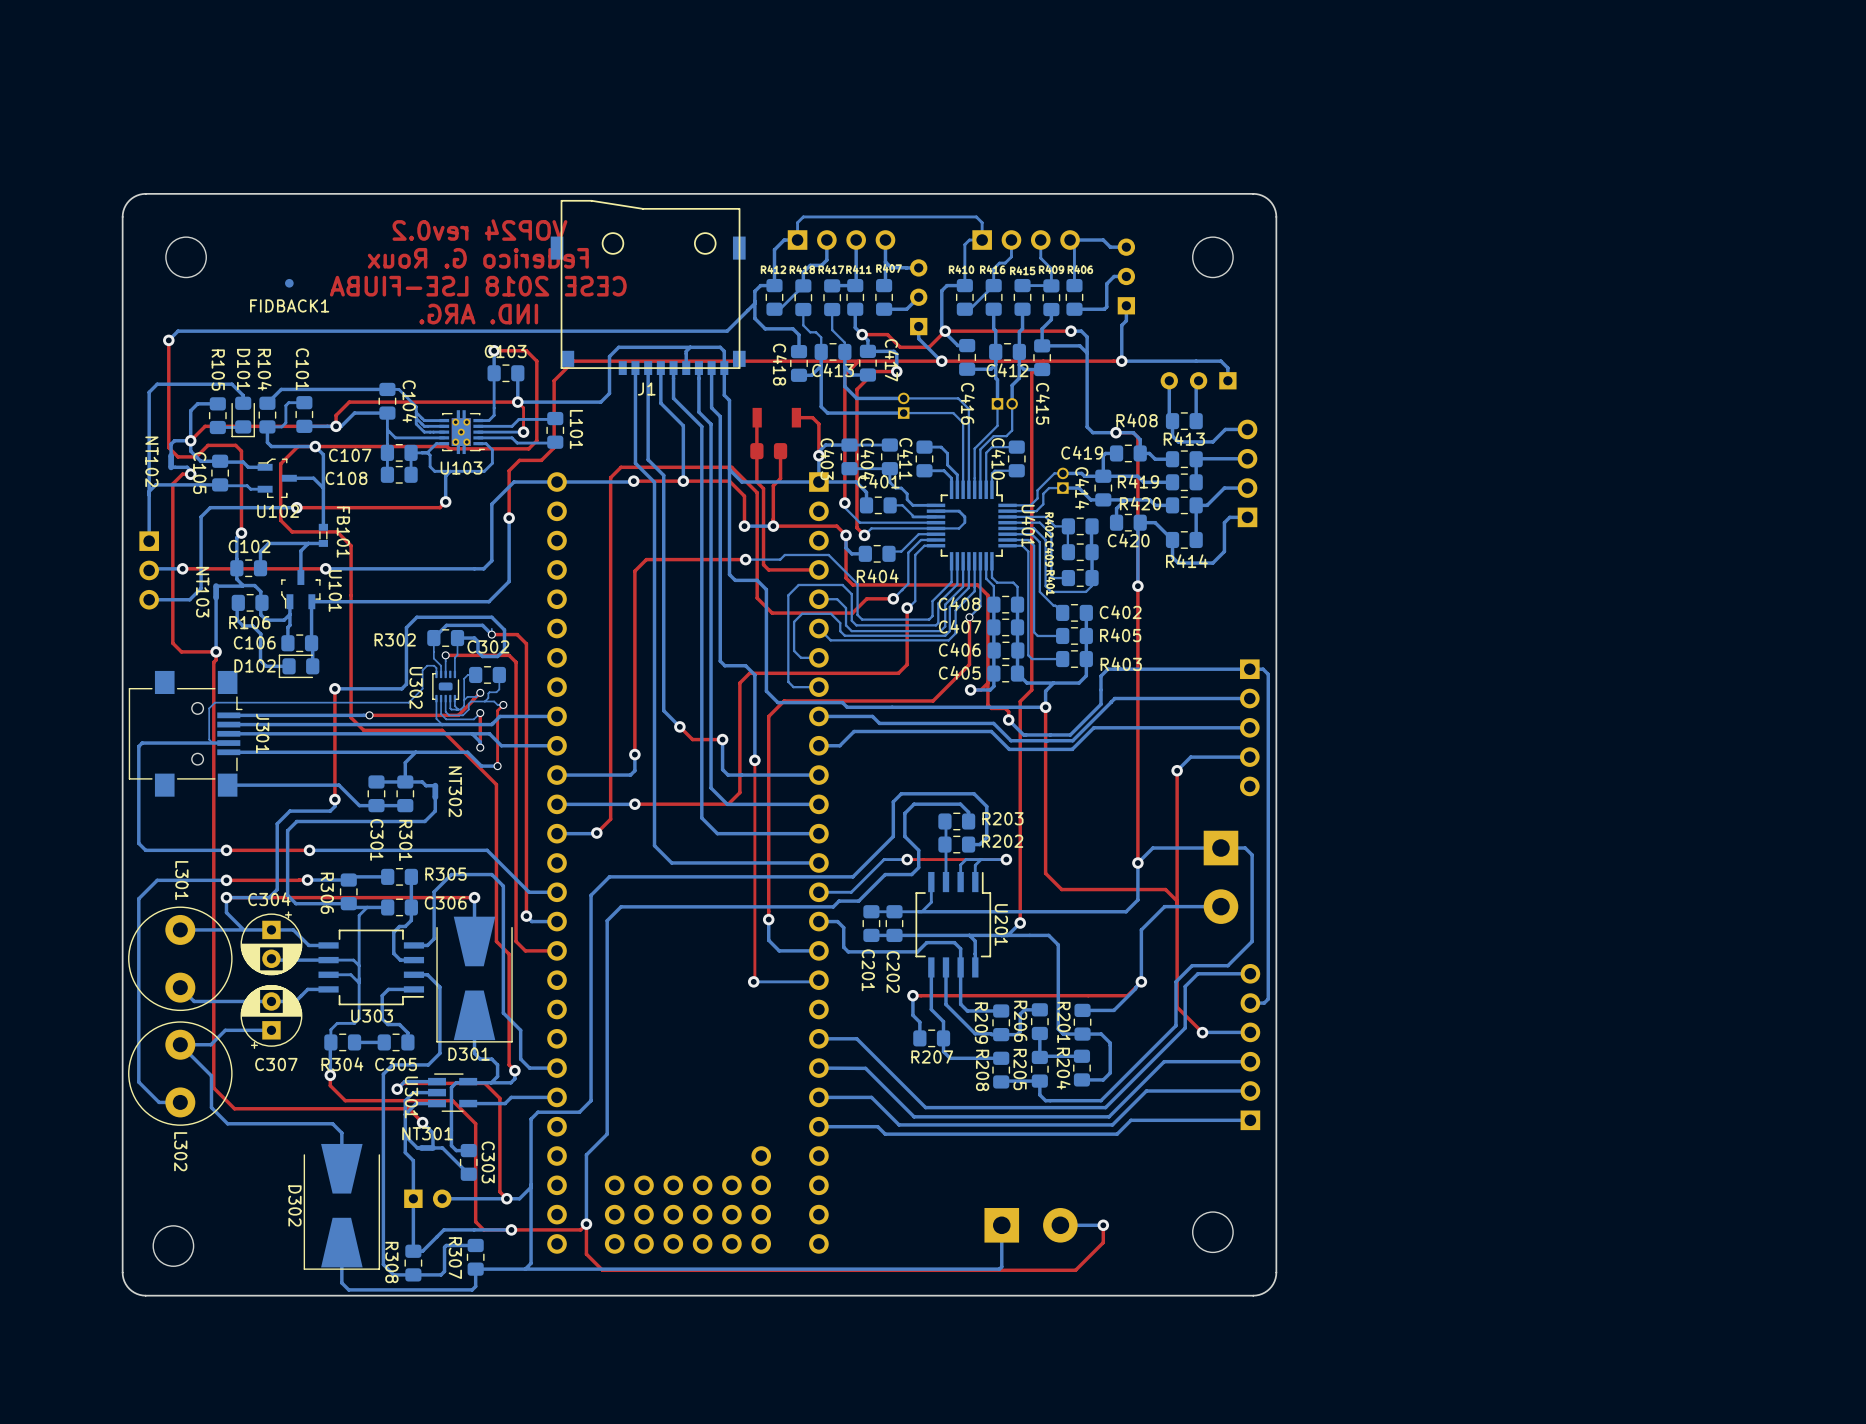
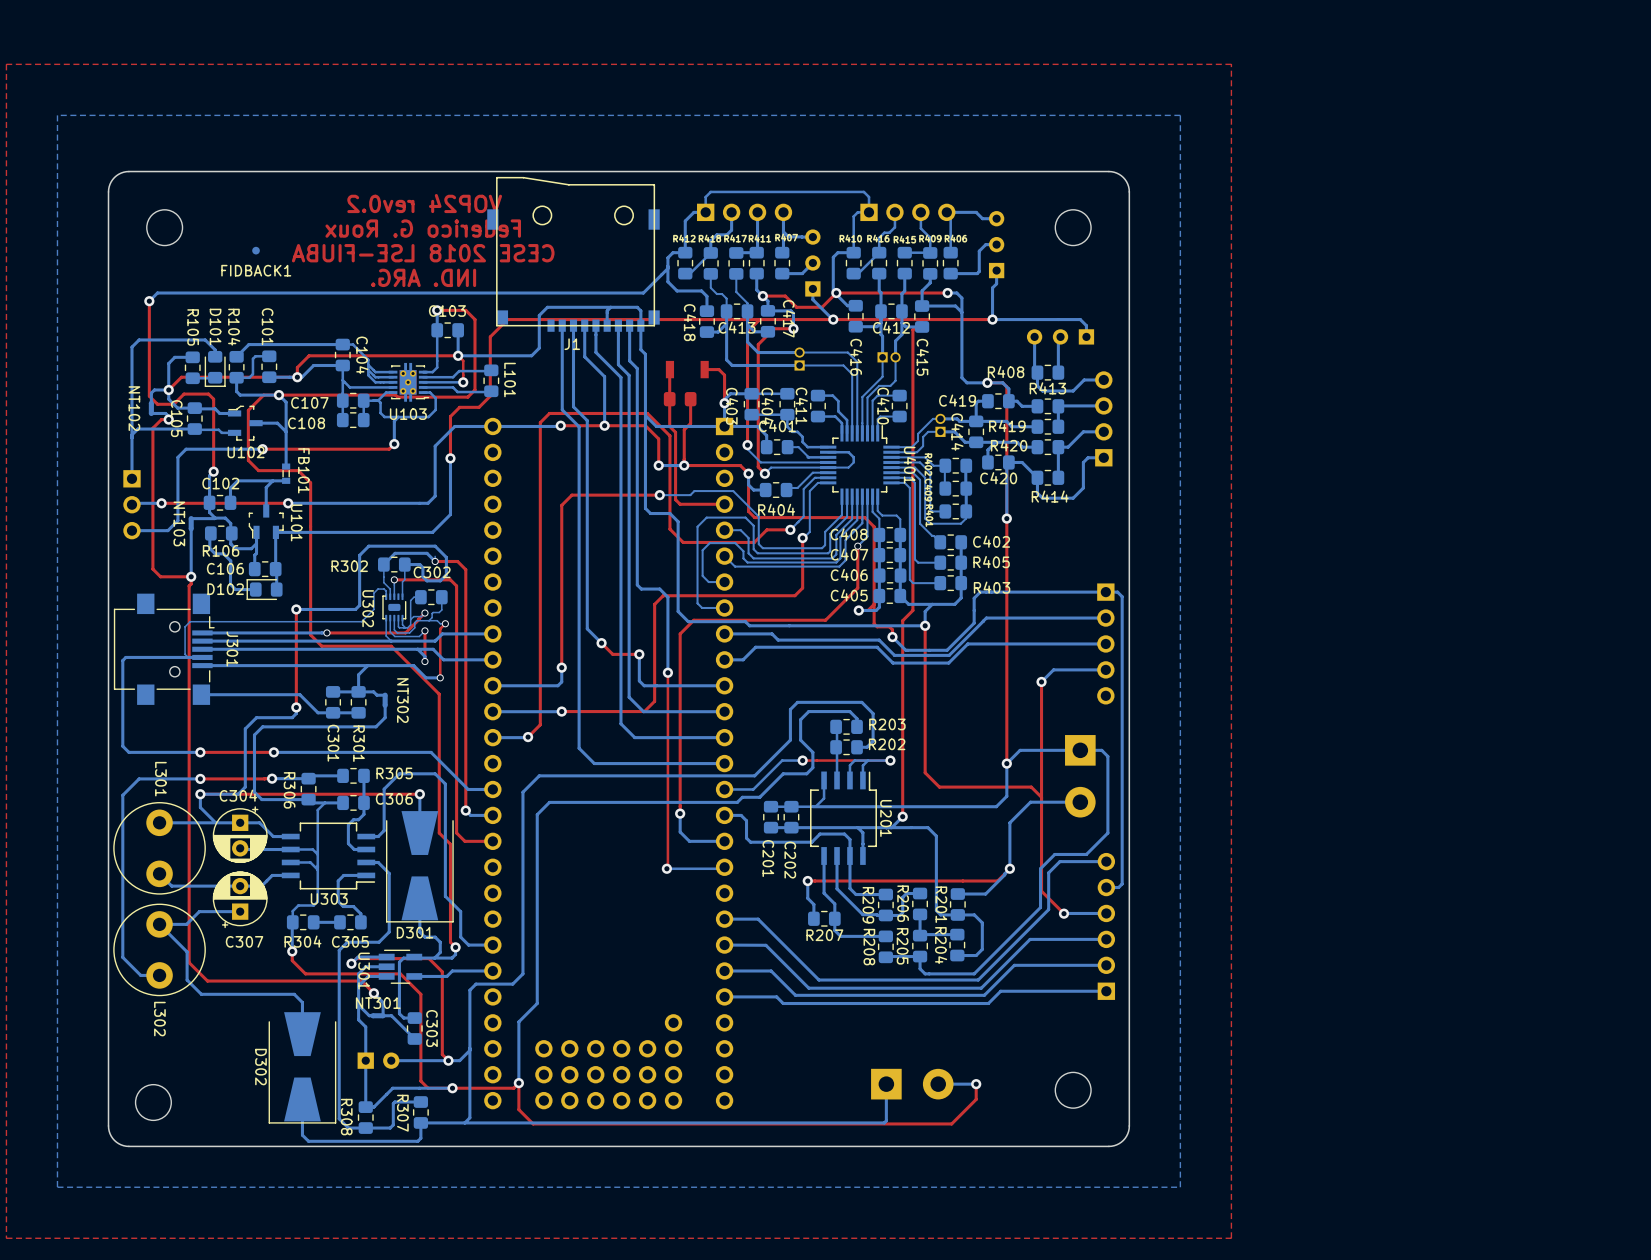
top zone outline: none -> (1231, 64) (1231, 1238) (6, 1238) (6, 64) (1231, 64)
bottom zone outline: none -> (1180, 115) (57, 115) (57, 1187) (1180, 1187) (1180, 115)

